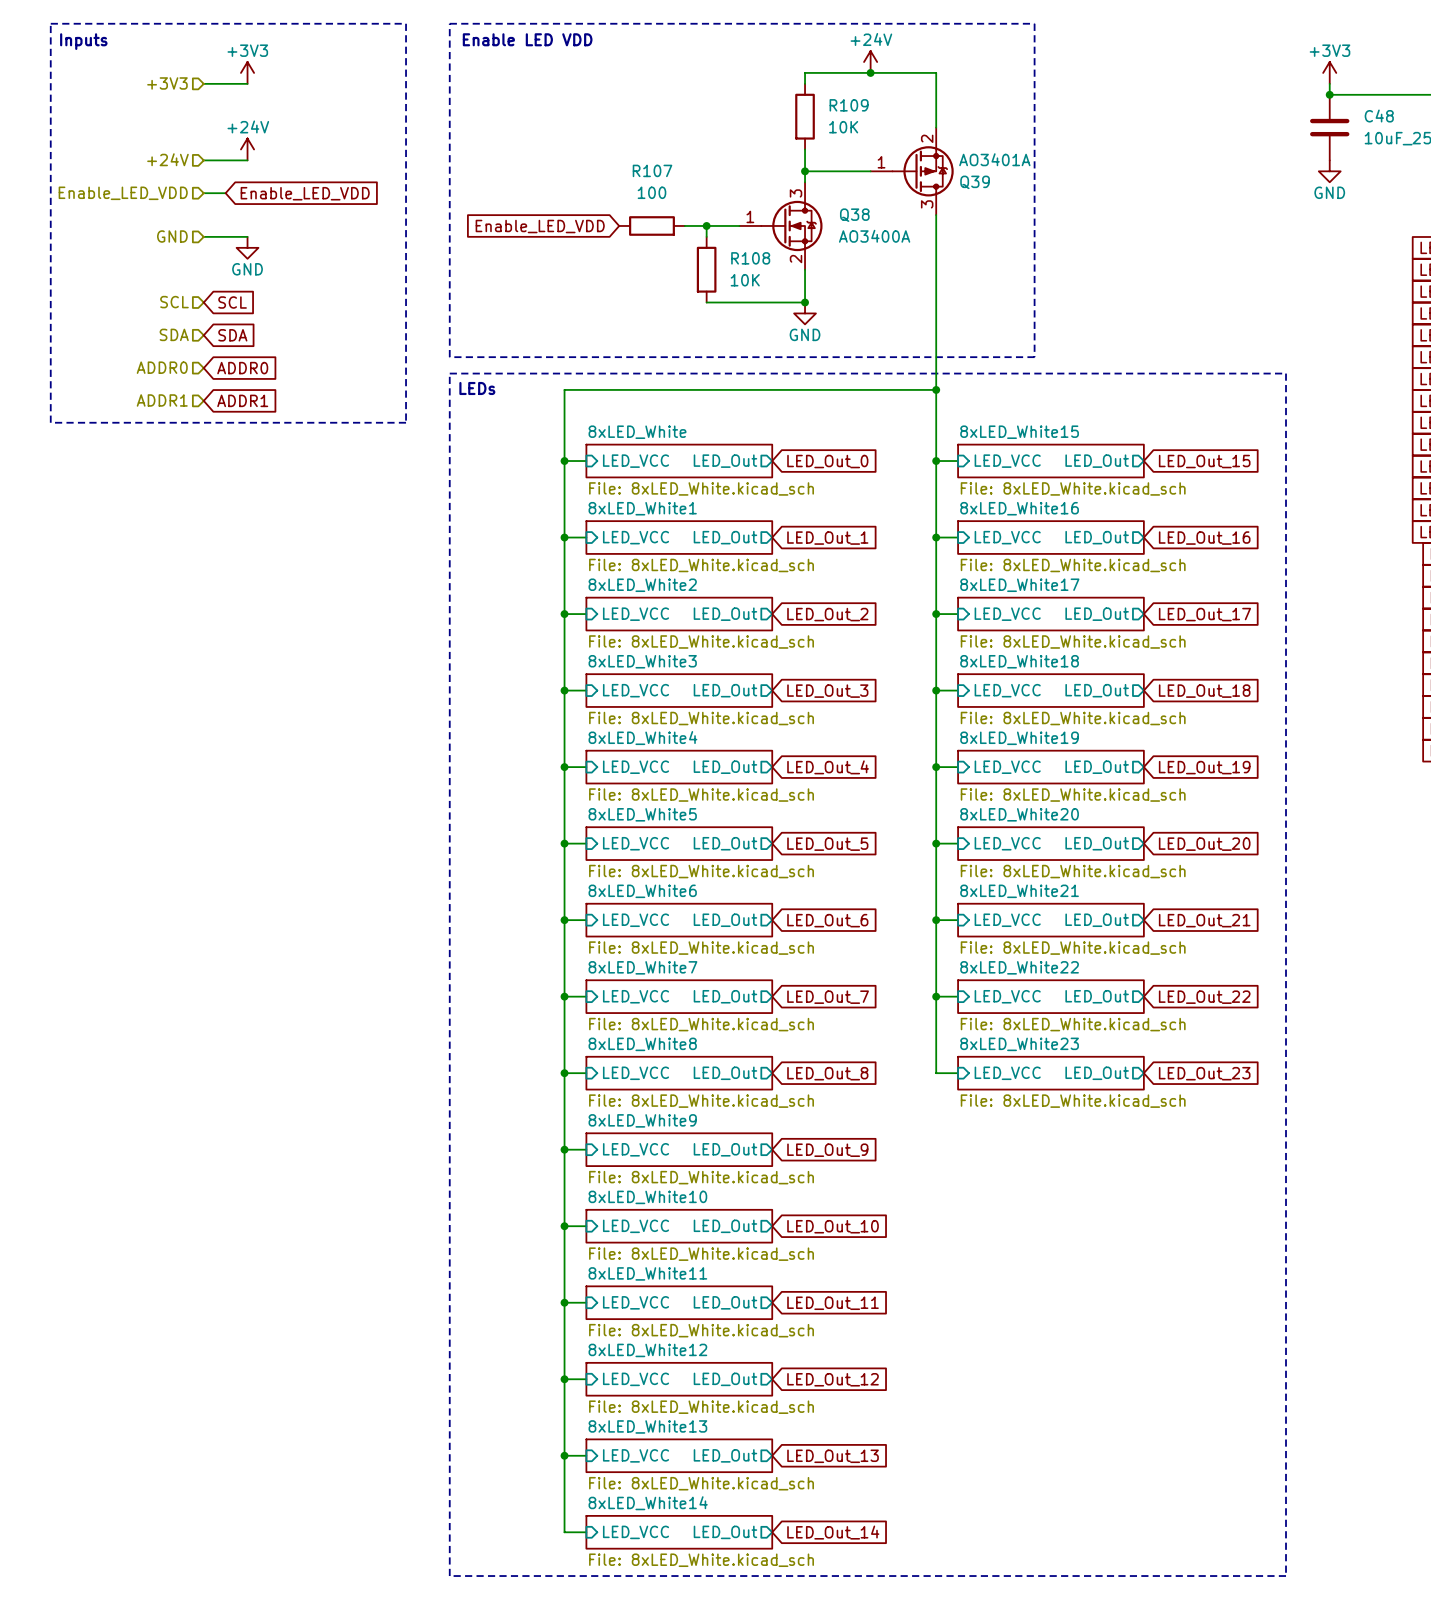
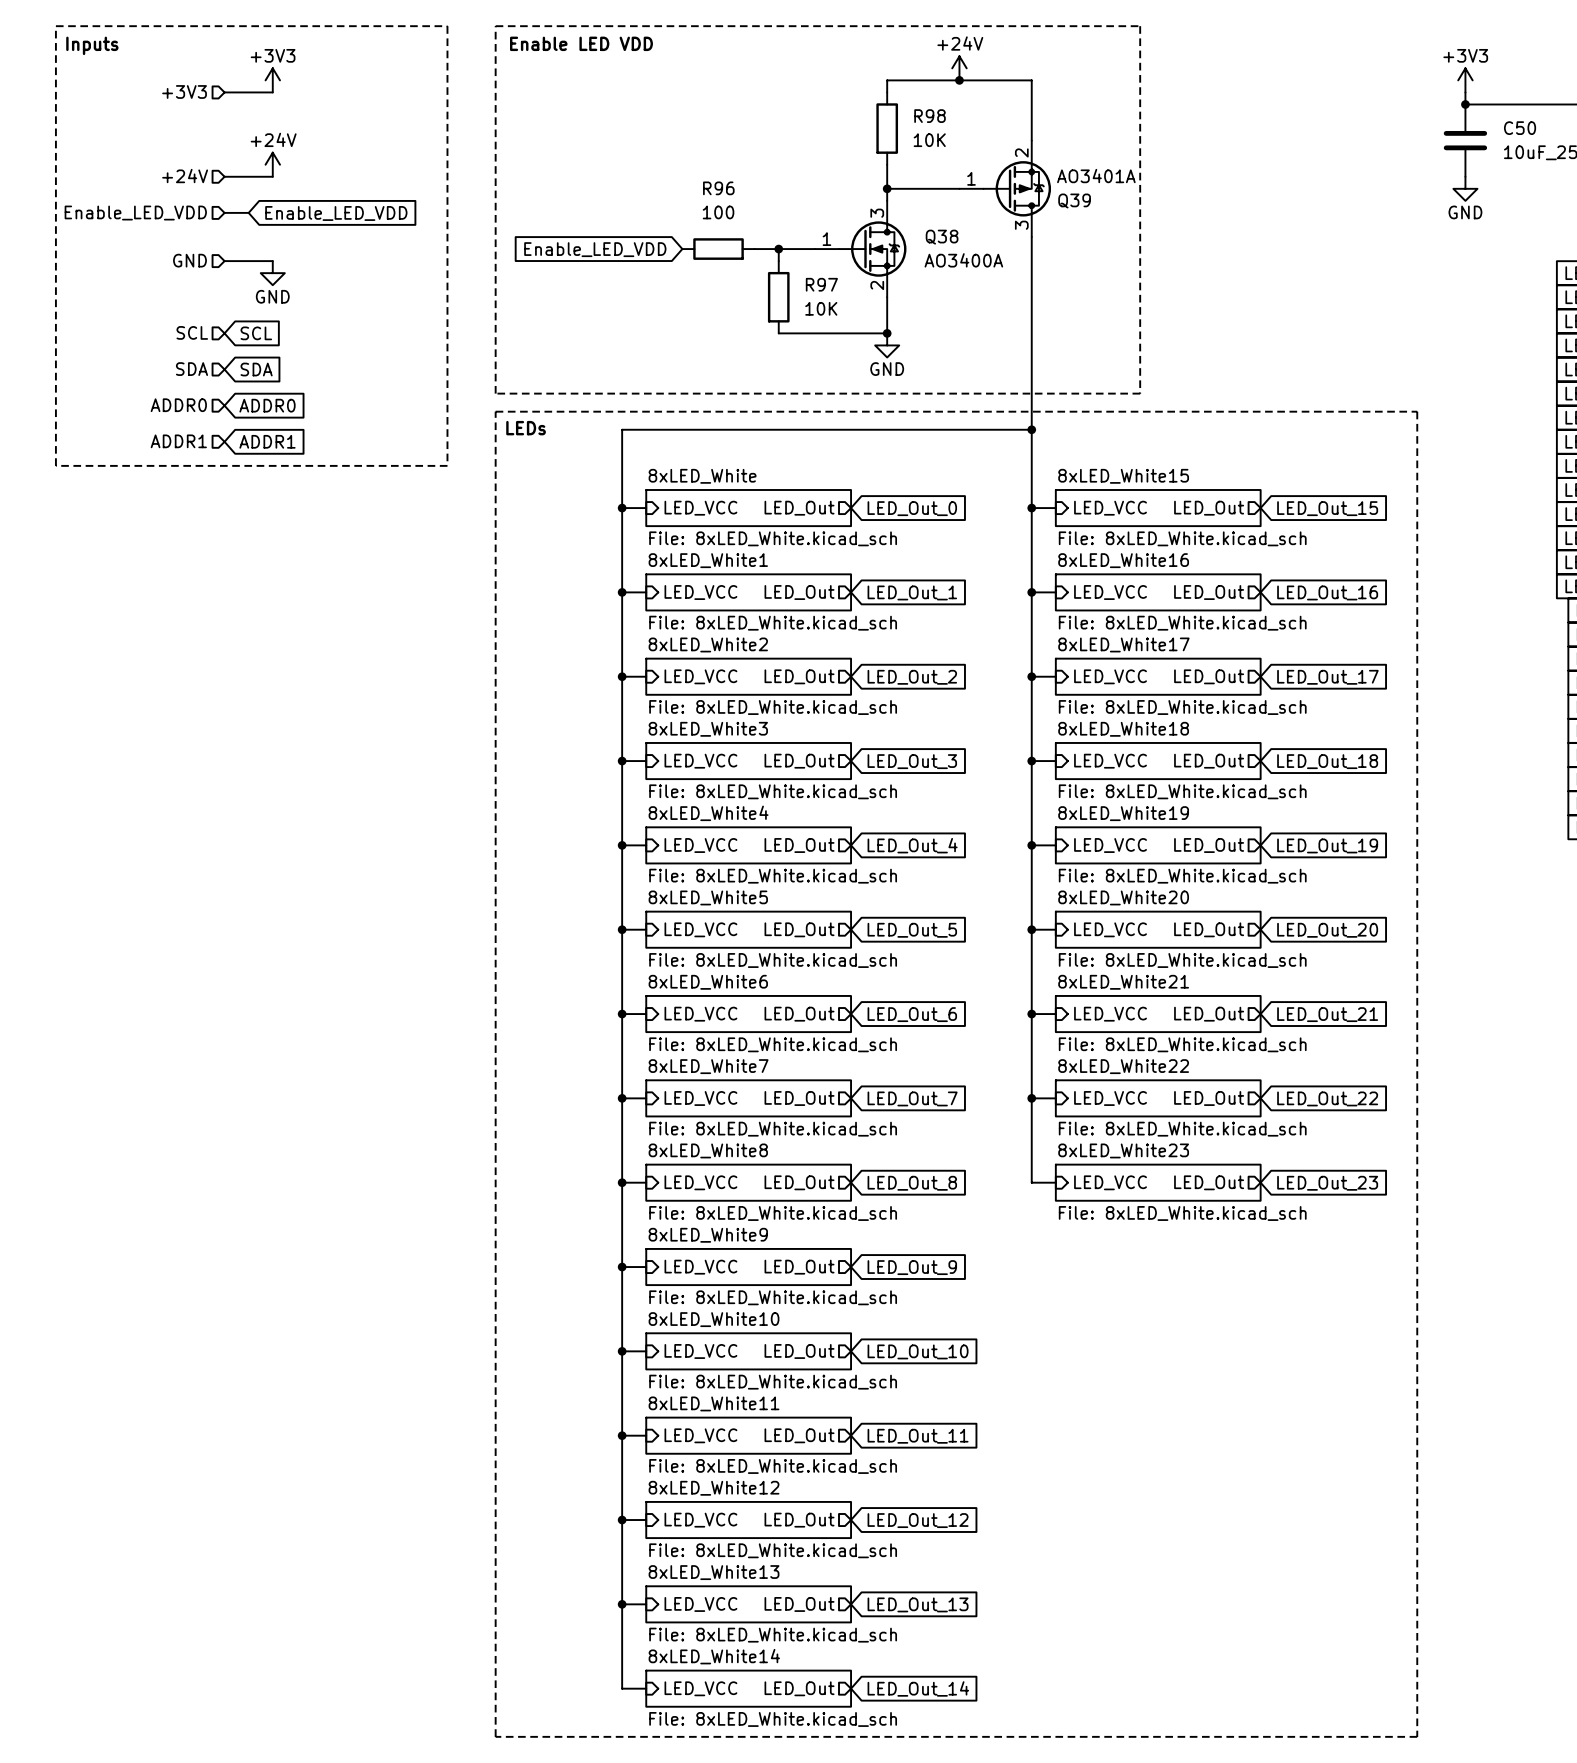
R109 name: R109 (849, 105) -> R98 (930, 116)
C48 name: C48 (1379, 116) -> C50 (1520, 128)
R107 name: R107 (652, 170) -> R96 (718, 188)
R108 name: R108 (750, 258) -> R97 (821, 284)

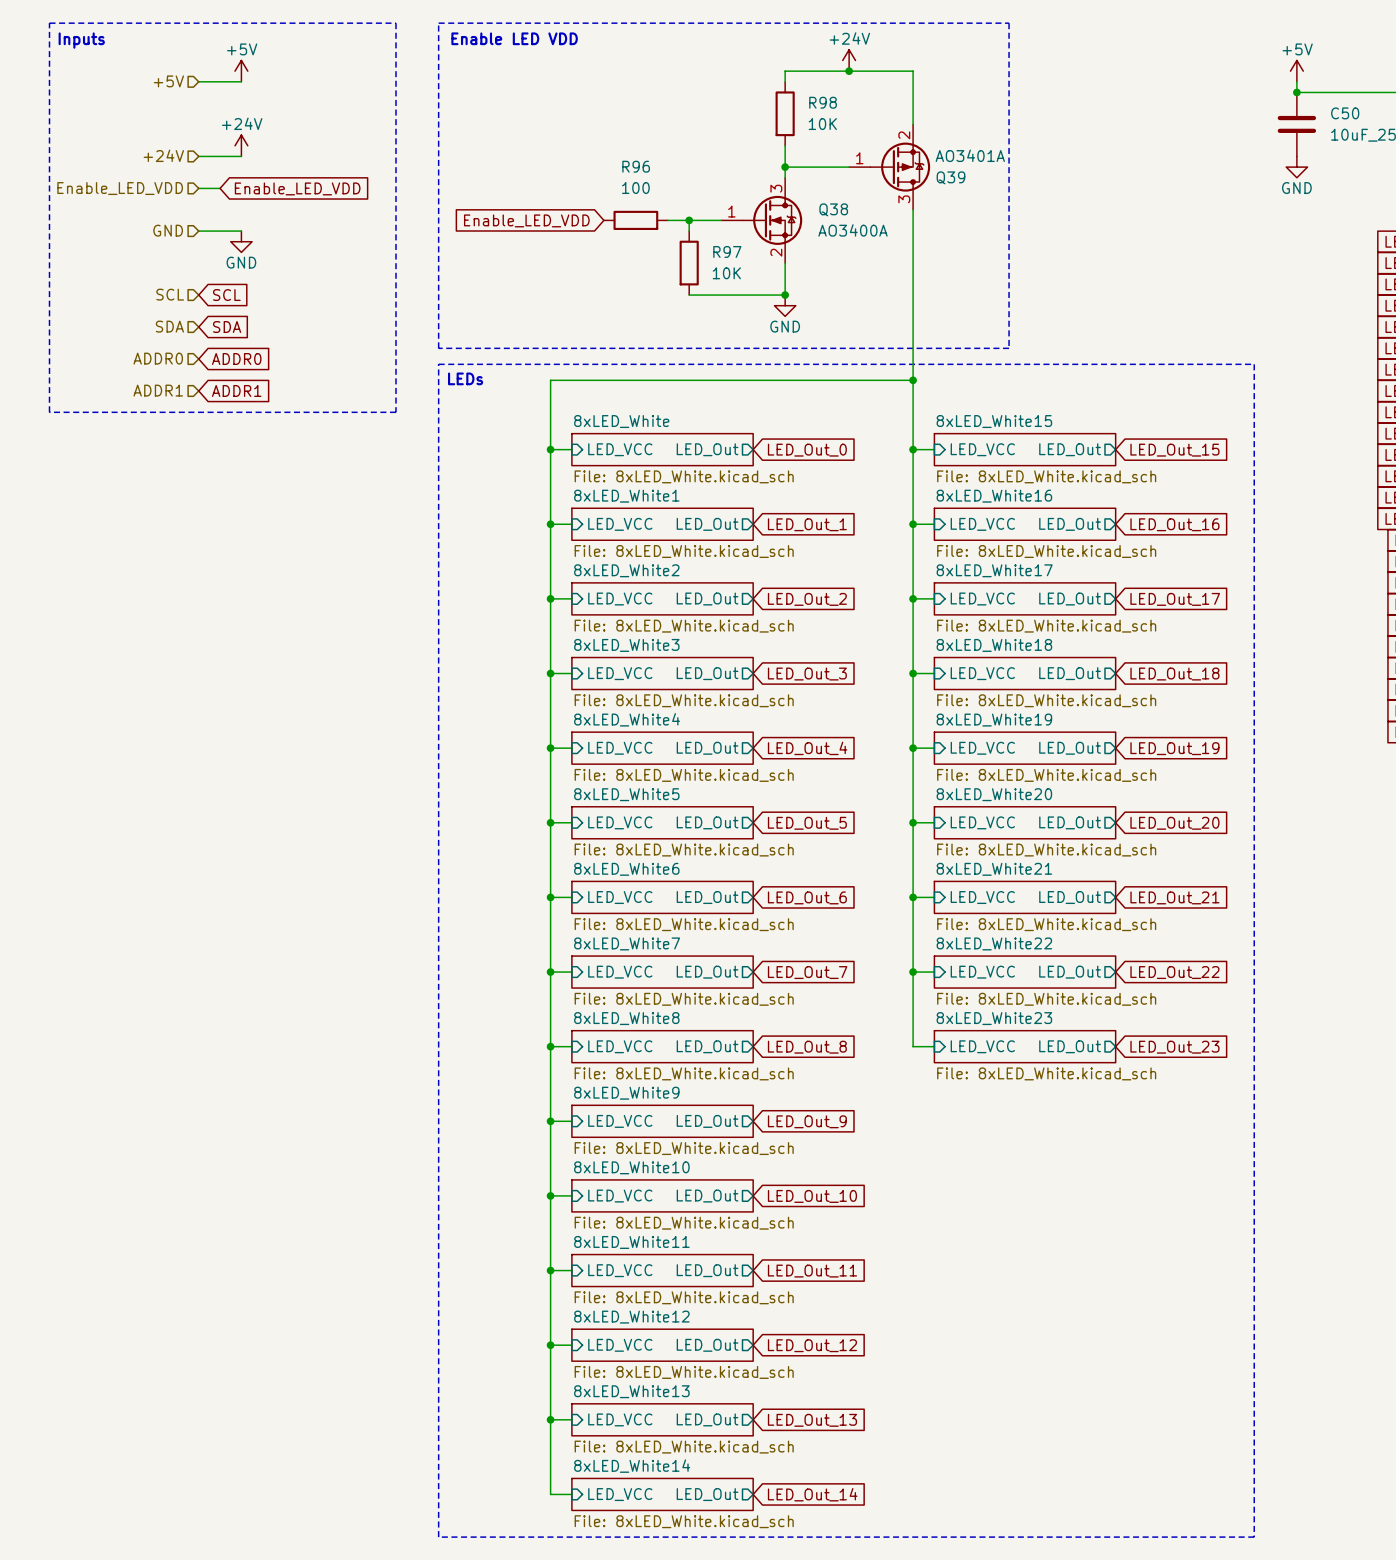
power symbol: +3V3 (272, 80) -> +5V (241, 71)
power symbol: +3V3 (1465, 80) -> +5V (1296, 71)
hierarchical label: +3V3 (184, 91) -> +5V (168, 81)

